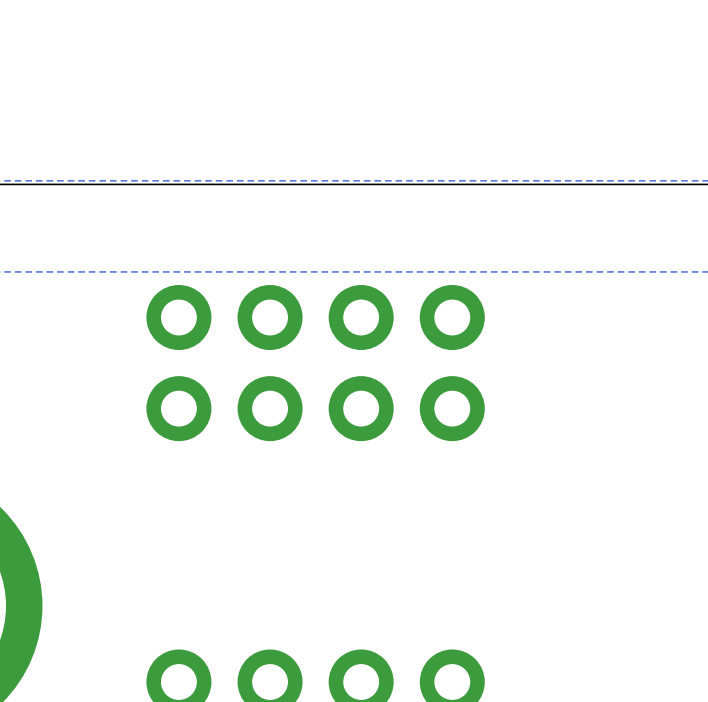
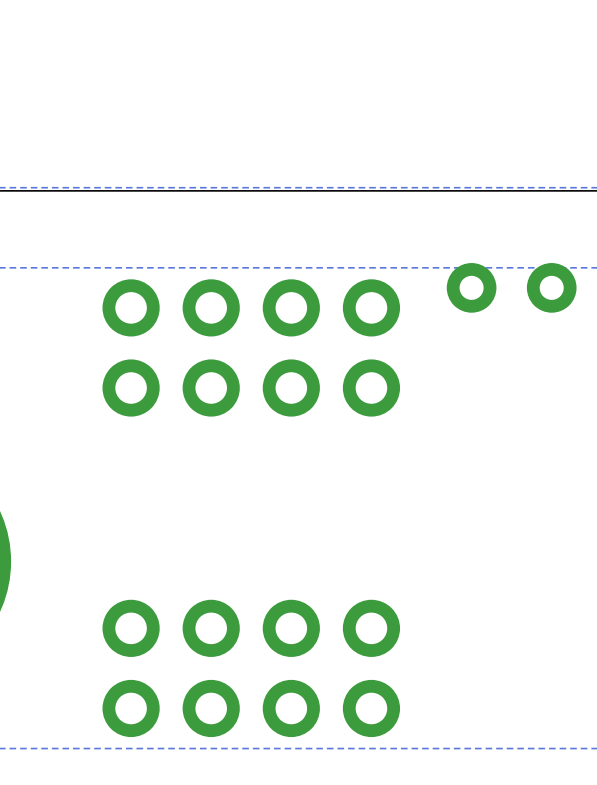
via: none -> (471, 287)
via: none -> (551, 287)

